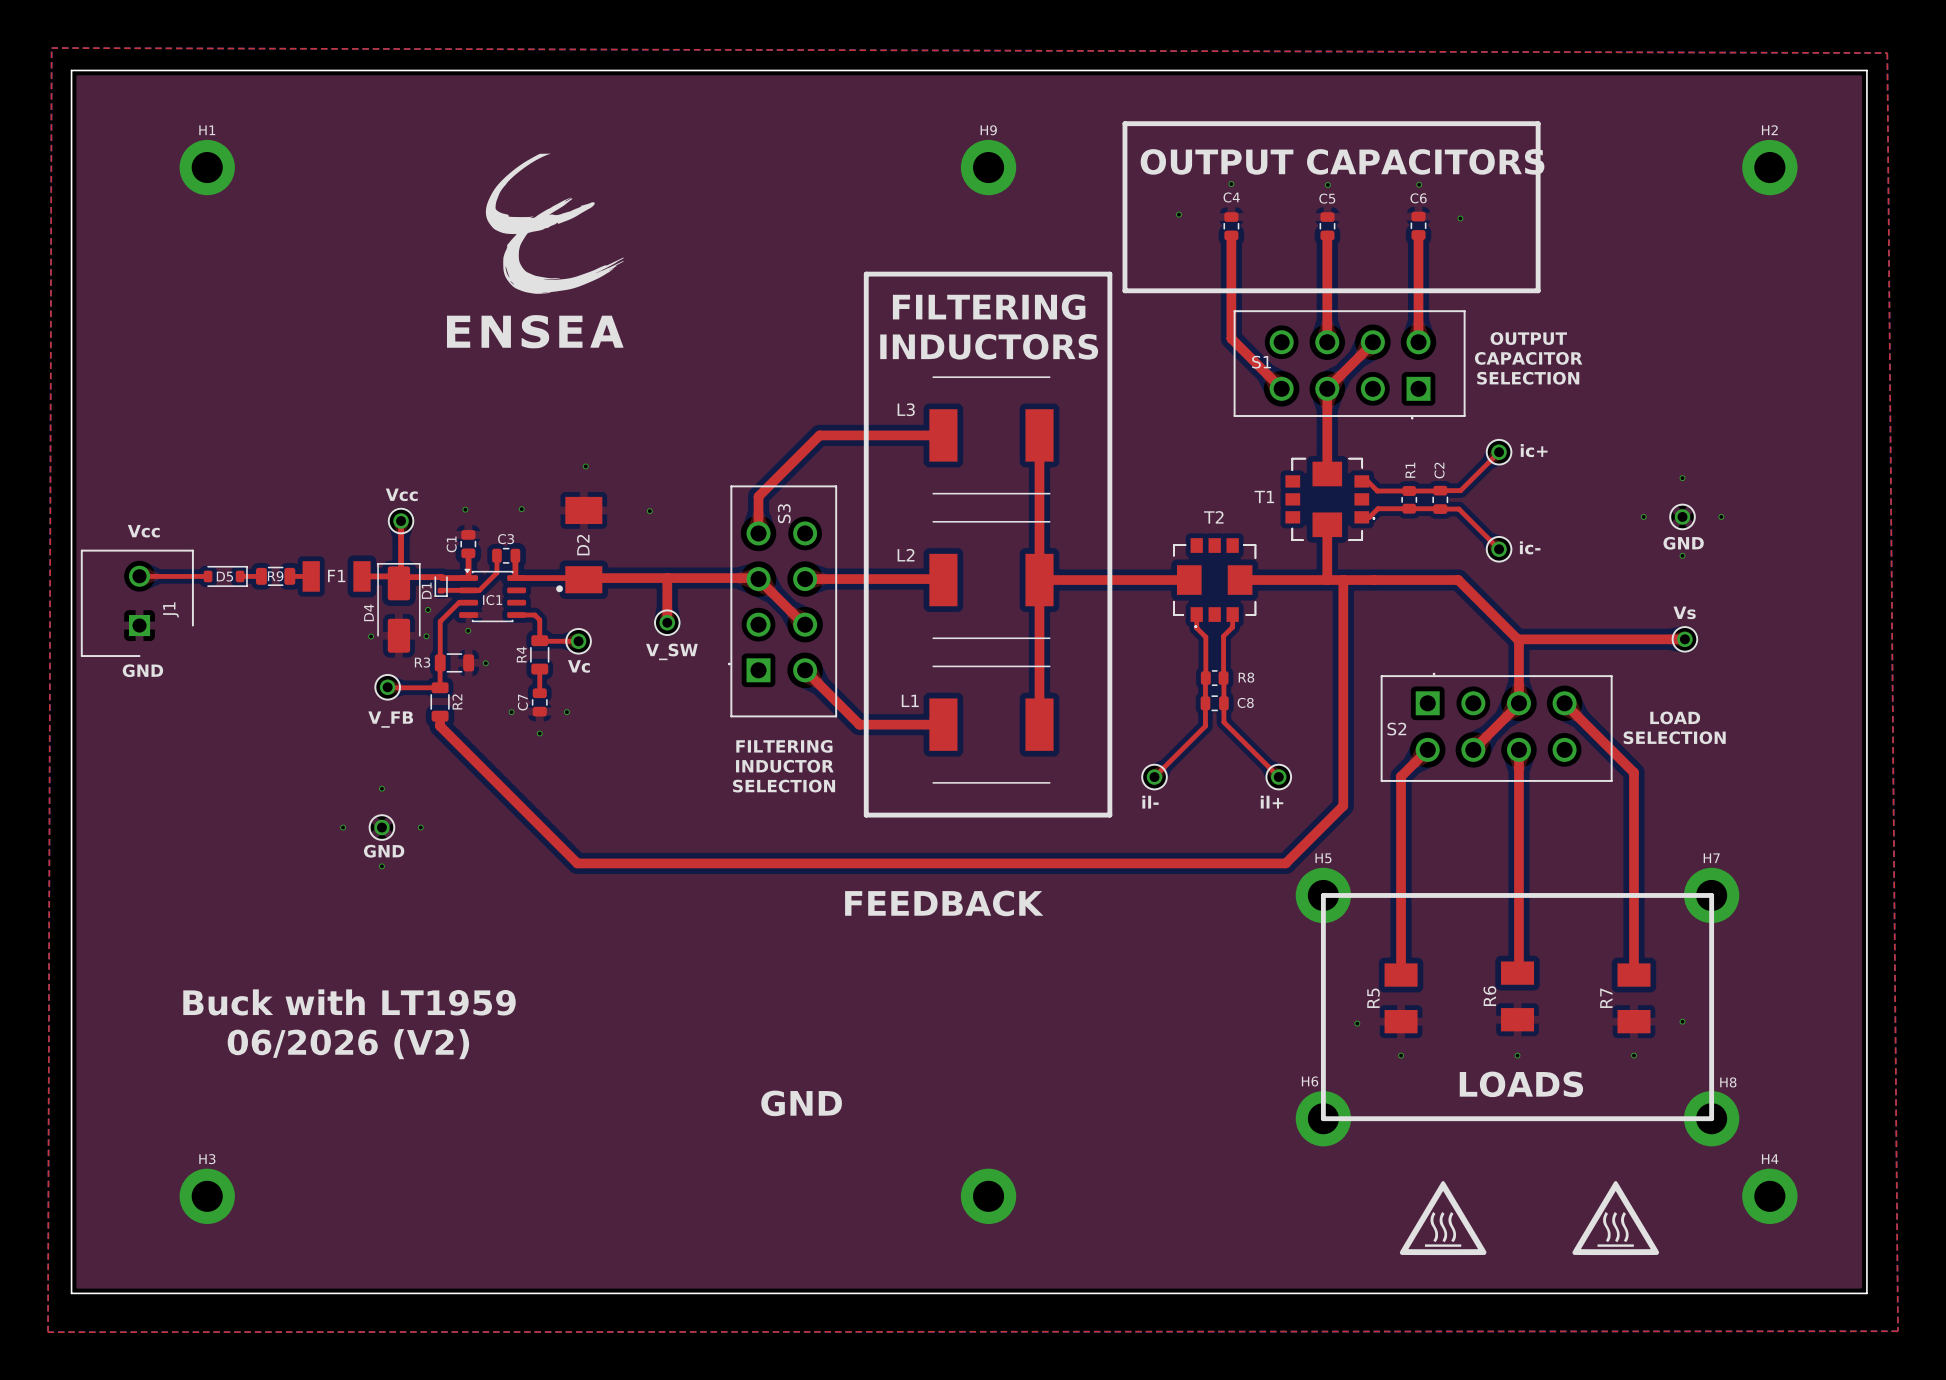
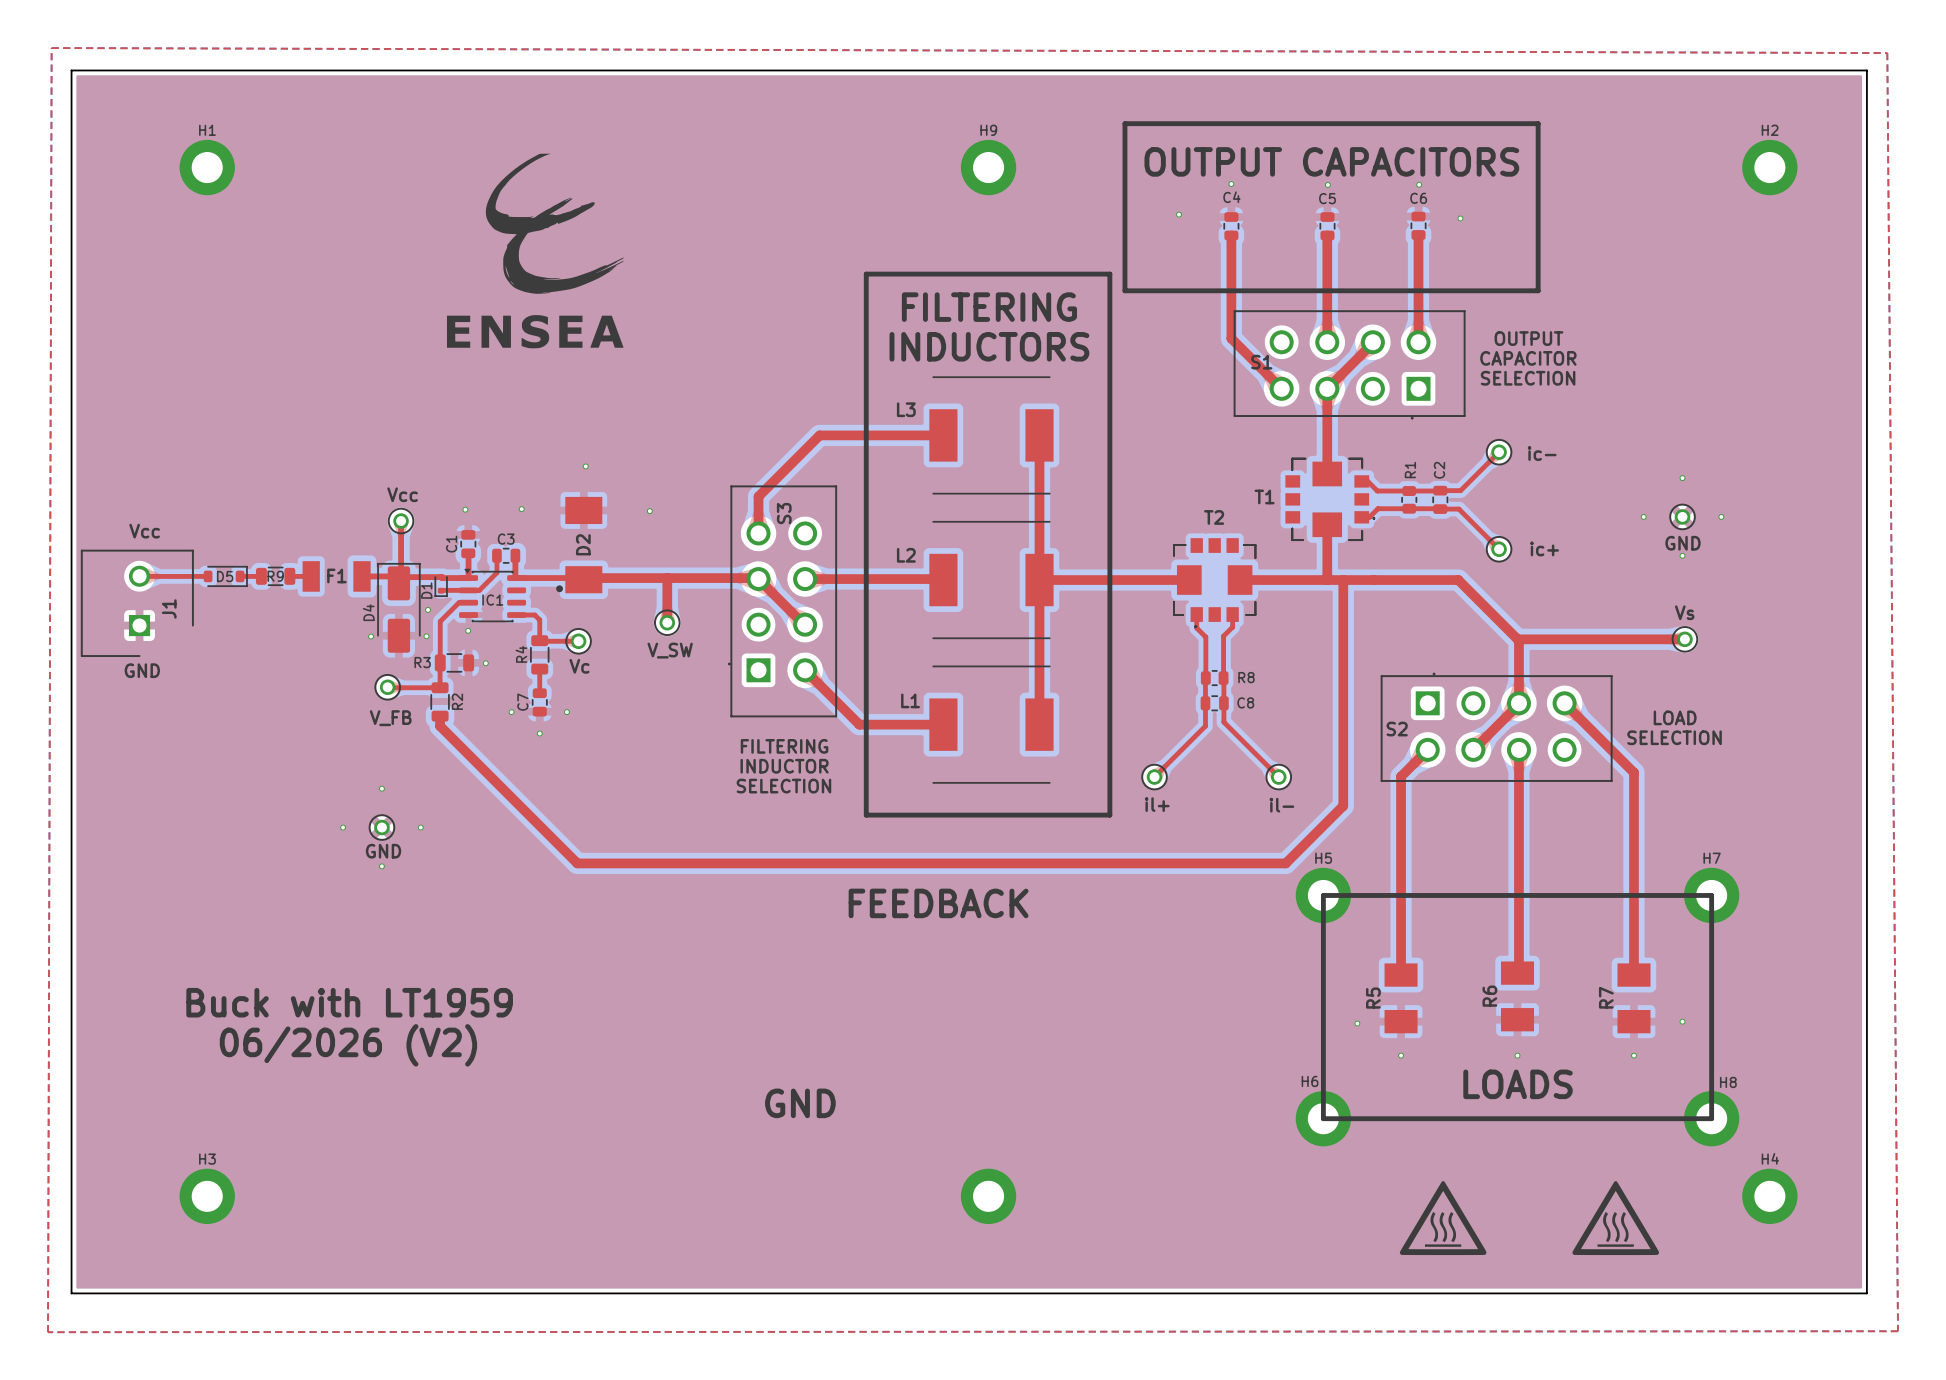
text position: ic+ (1534, 450) -> ic+ (1544, 548)
text position: ic- (1530, 547) -> ic- (1542, 453)
text position: il- (1150, 802) -> il- (1281, 805)
text position: il+ (1272, 802) -> il+ (1157, 804)

